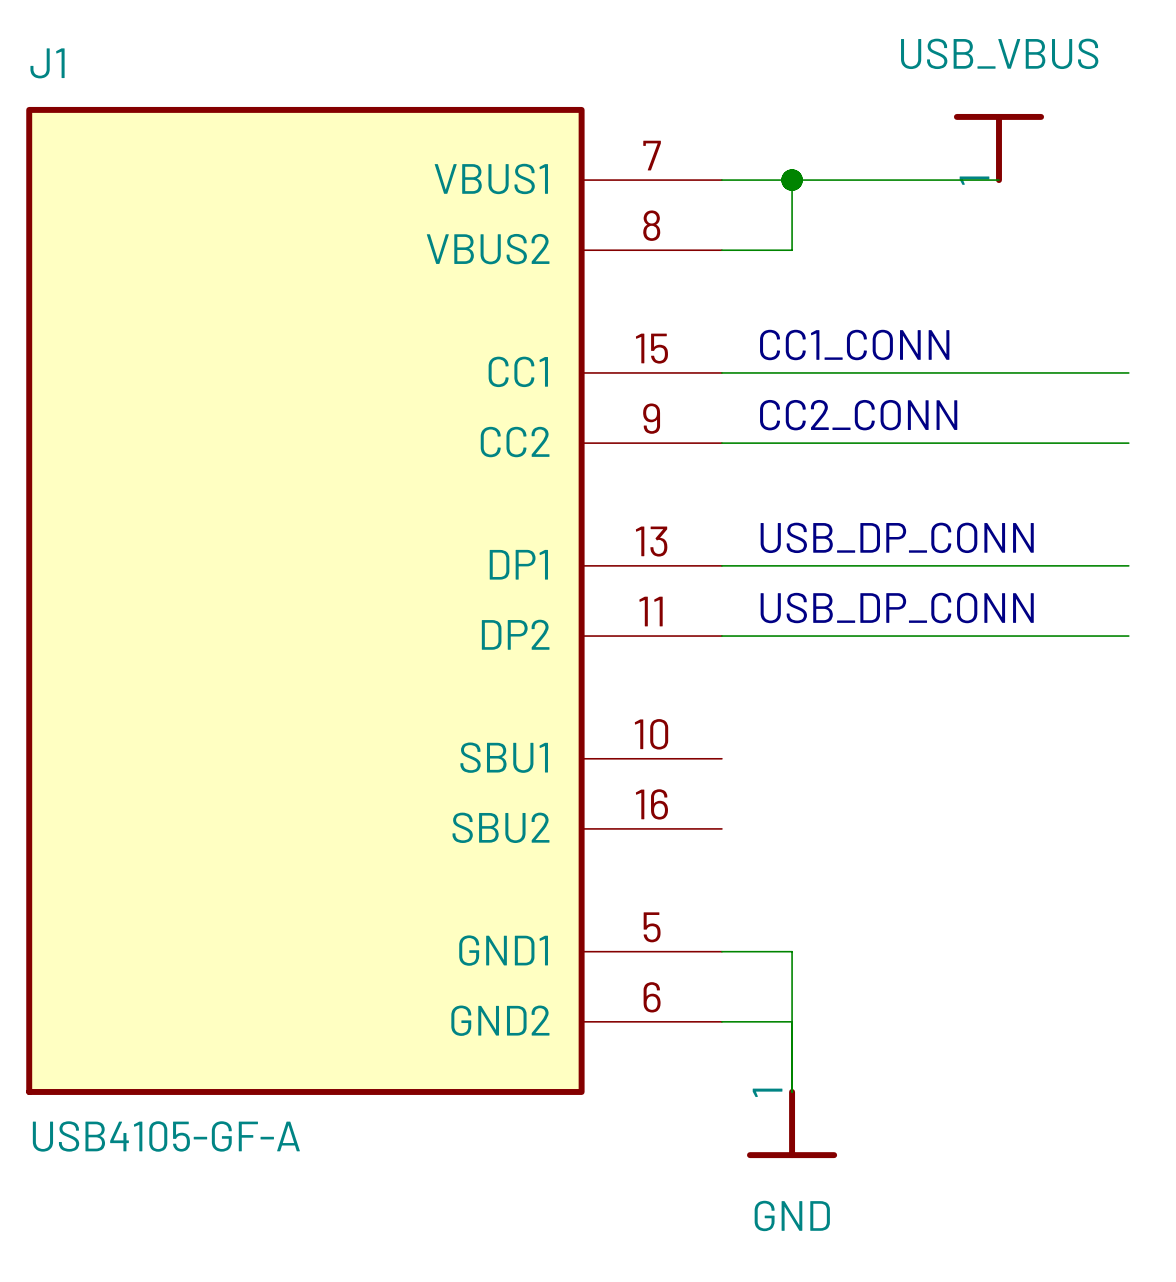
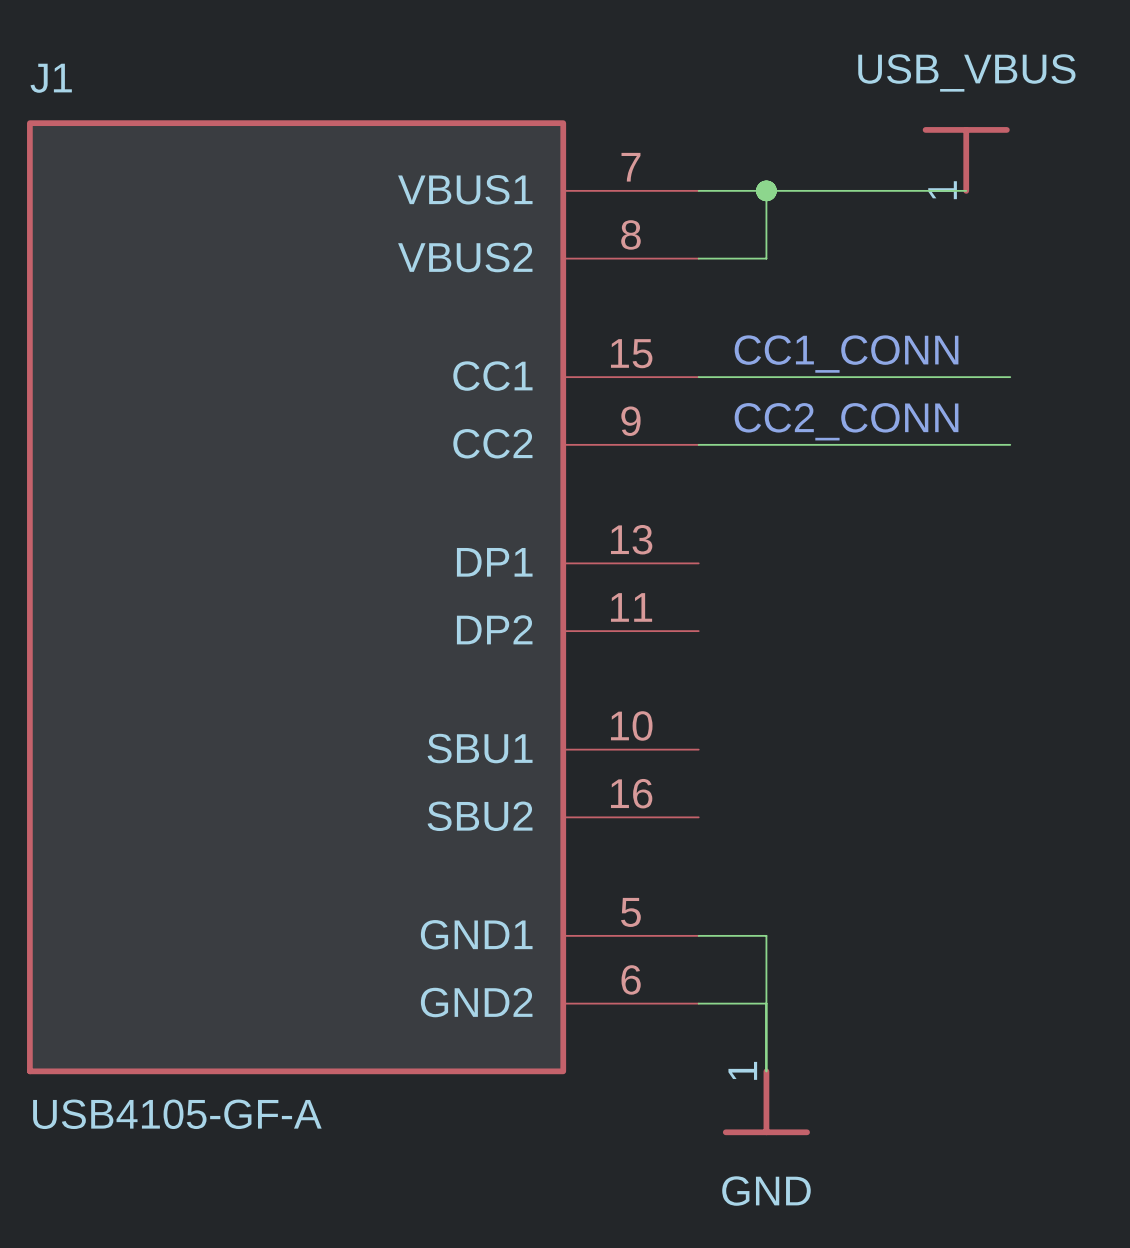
wire: (1044, 372) (1128, 372) -> none
wire: (1044, 443) (1128, 443) -> none
text: USB_DP_CONN (897, 537) -> none
wire: (721, 565) (1128, 565) -> none
text: USB_DP_CONN (897, 608) -> none
wire: (721, 636) (1128, 636) -> none

